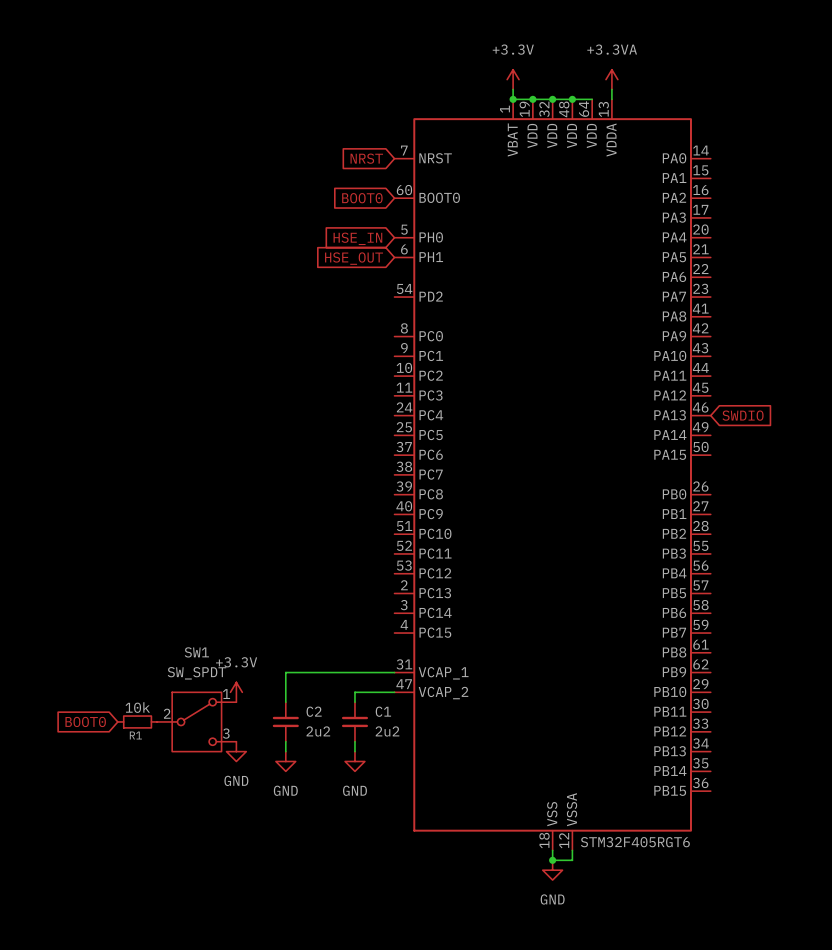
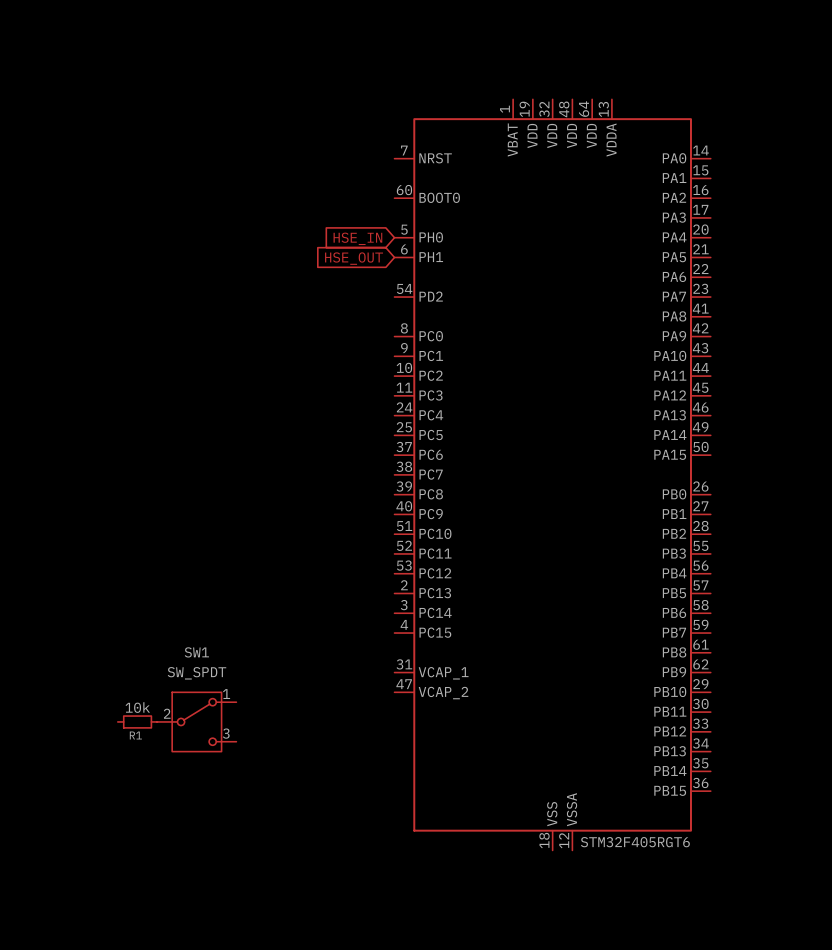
power symbol: +3.3V (513, 79) -> none
power symbol: +3.3VA (611, 79) -> none
wire: (513, 89) (513, 99) (592, 99) -> none
wire: (611, 89) (611, 99) -> none
junction: (513, 99) -> none
junction: (532, 99) -> none
junction: (552, 99) -> none
junction: (572, 99) -> none
global label: NRST (366, 158) -> none
global label: BOOT0 (362, 198) -> none
global label: SWDIO (743, 415) -> none
wire: (394, 672) (285, 672) (285, 702) -> none
power symbol: +3.3V (236, 692) -> none
wire: (394, 692) (354, 692) (354, 702) -> none
global label: BOOT0 (85, 721) -> none
C2: 2u2 (285, 721) -> none
C1: 2u2 (354, 721) -> none
wire: (285, 741) (285, 751) -> none
wire: (354, 741) (354, 751) -> none
power symbol: GND (236, 751) -> none
power symbol: GND (285, 761) -> none
power symbol: GND (354, 761) -> none
wire: (552, 850) (552, 860) (572, 860) (572, 850) -> none
junction: (552, 860) -> none
power symbol: GND (552, 870) -> none

